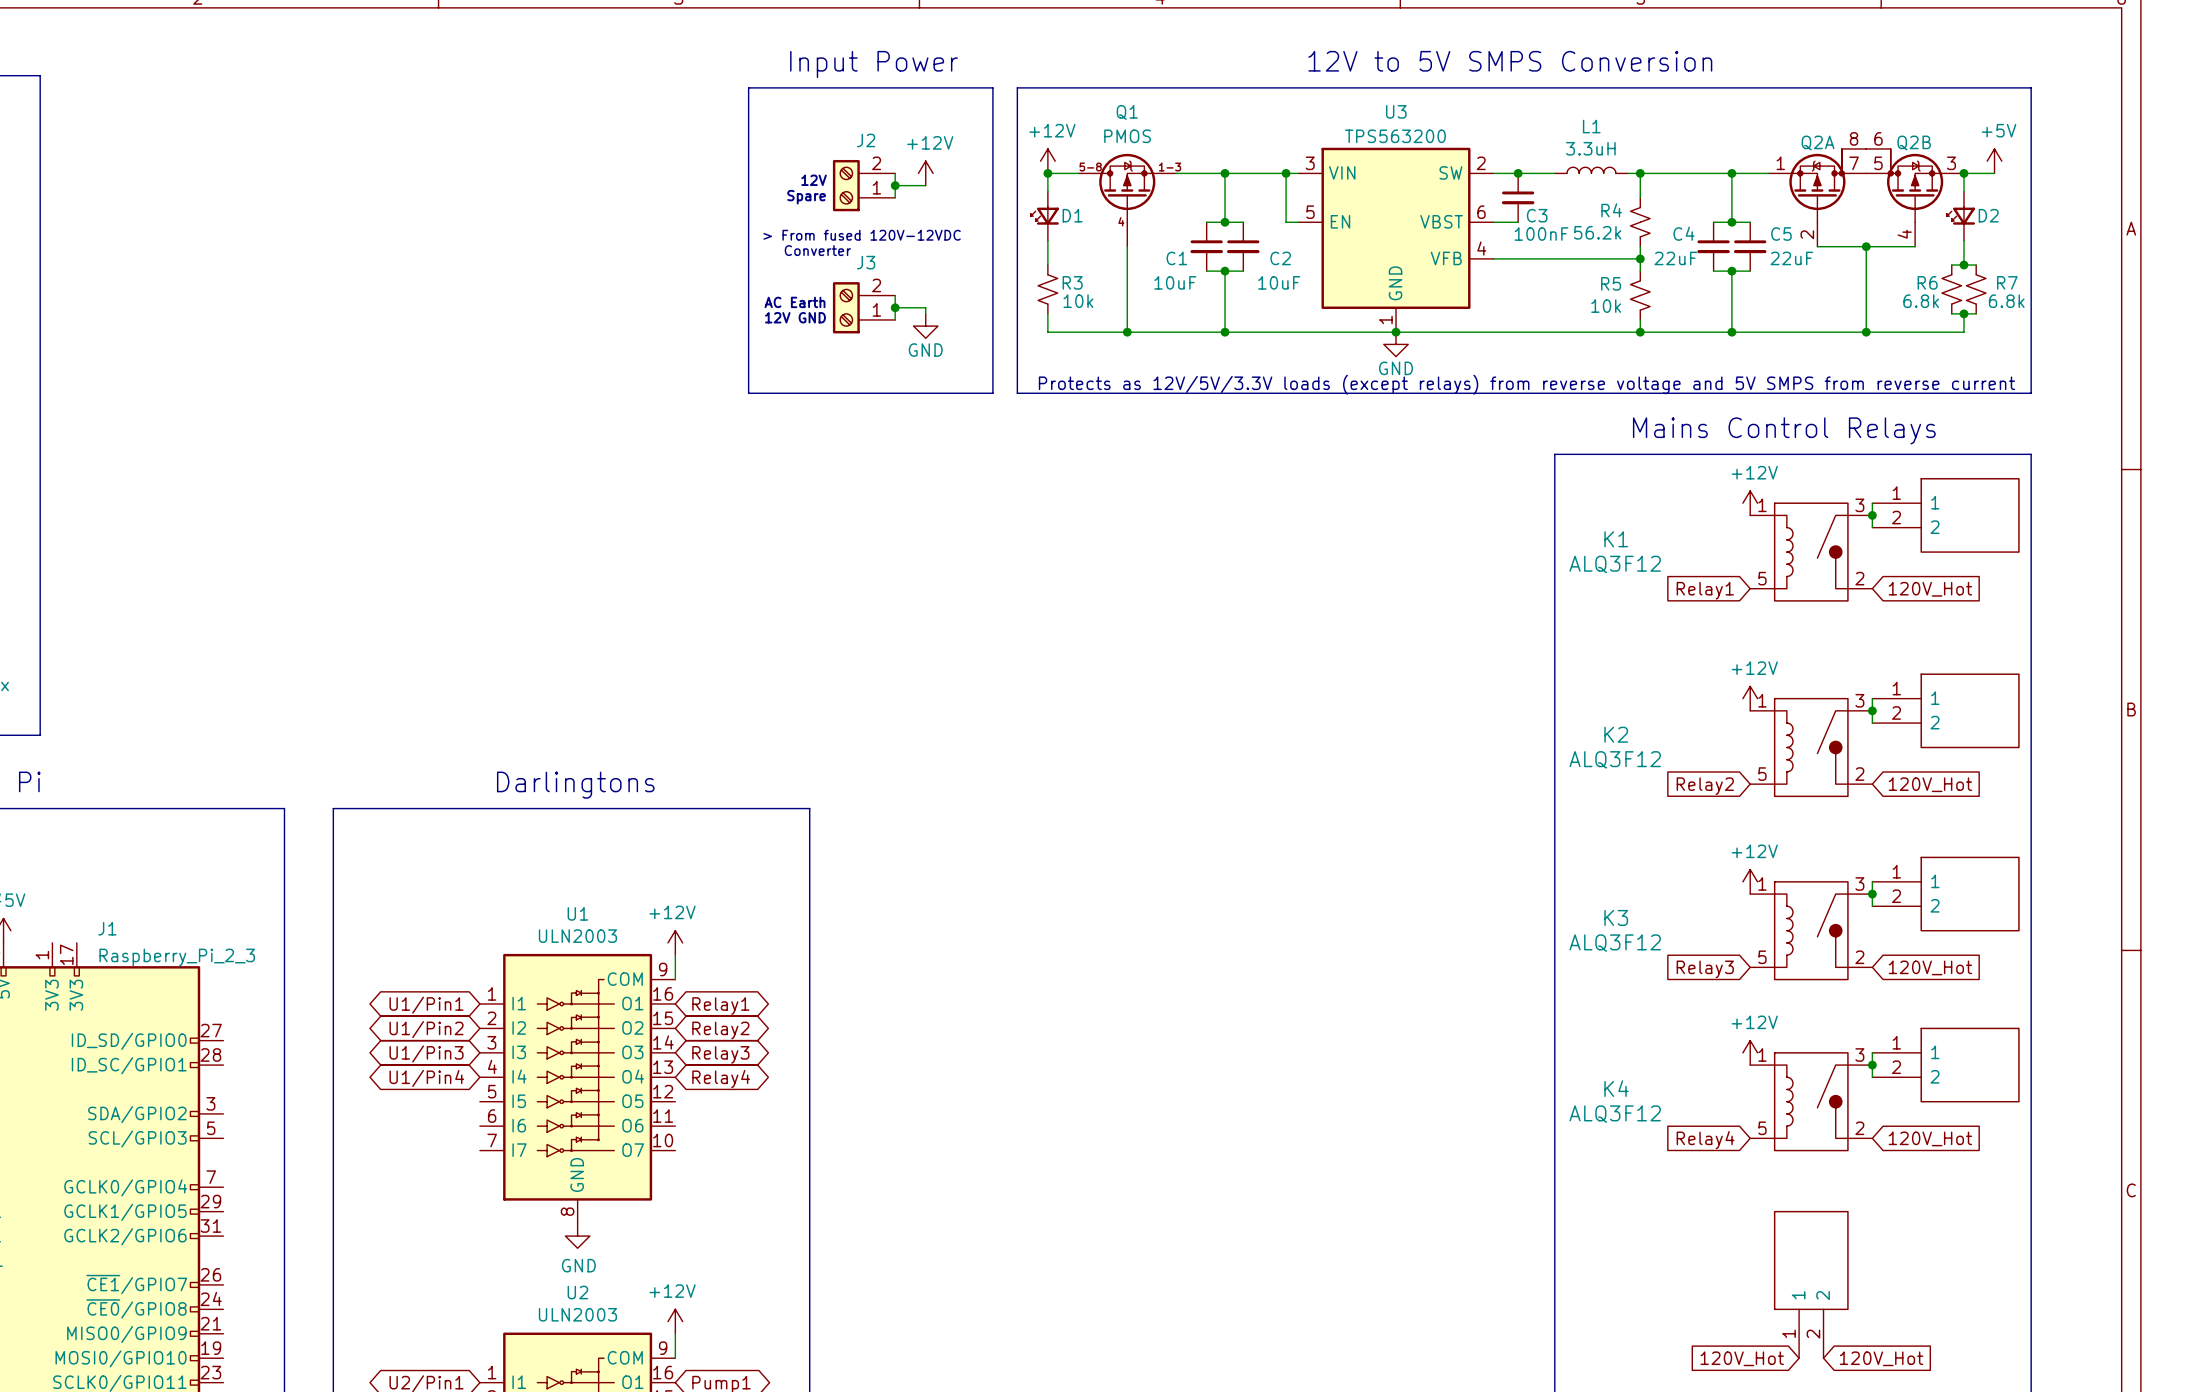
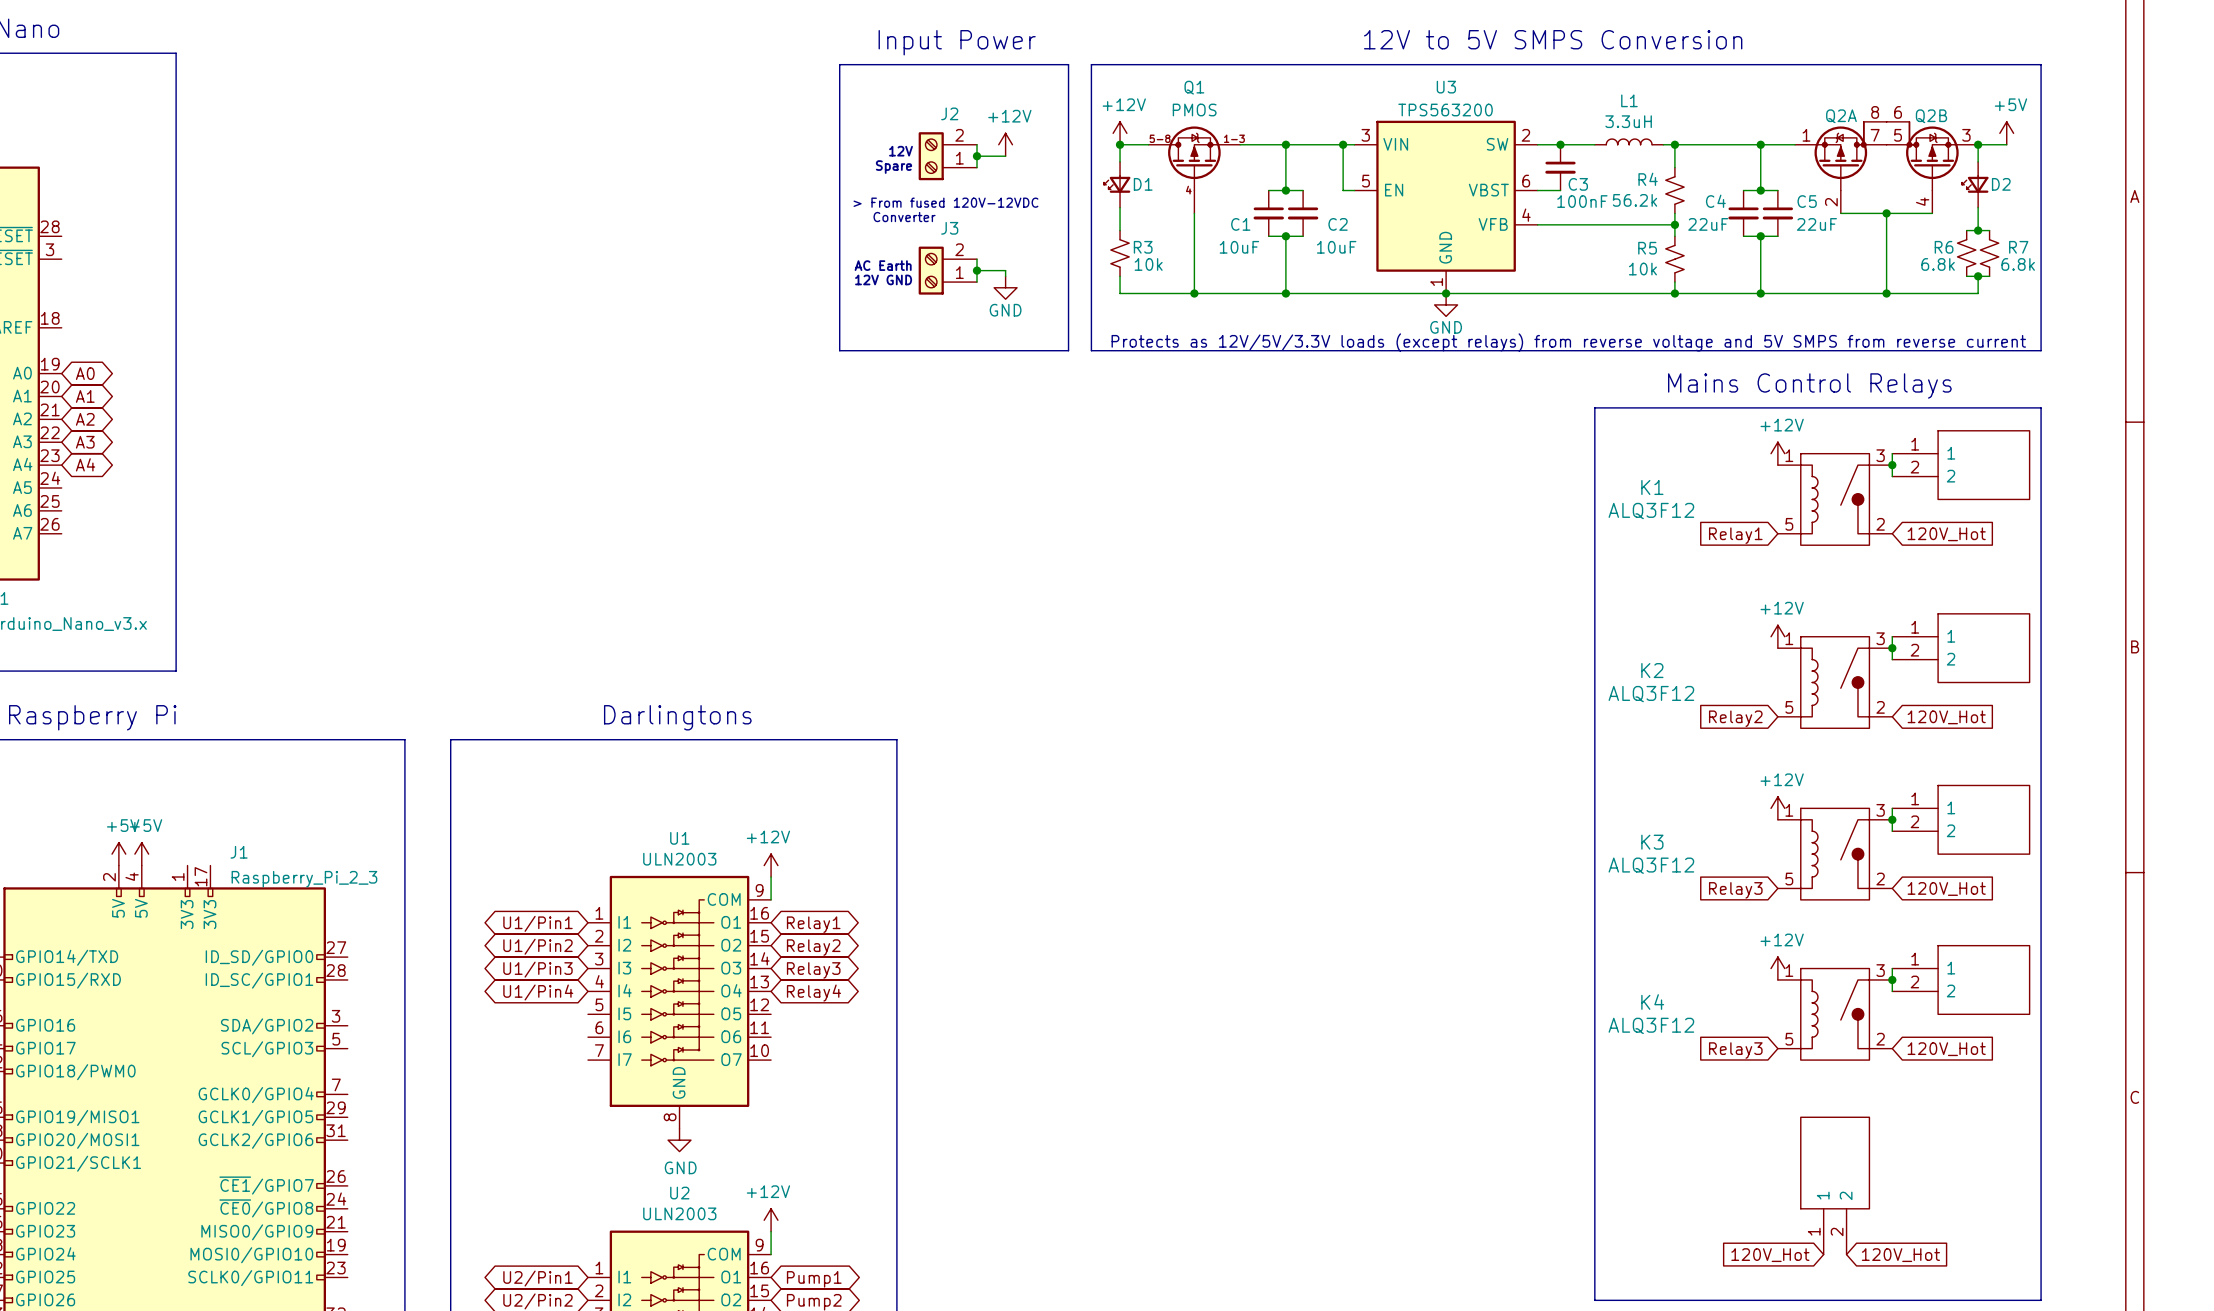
global label: Relay4 (1705, 1140) -> Relay3 (1735, 1050)

